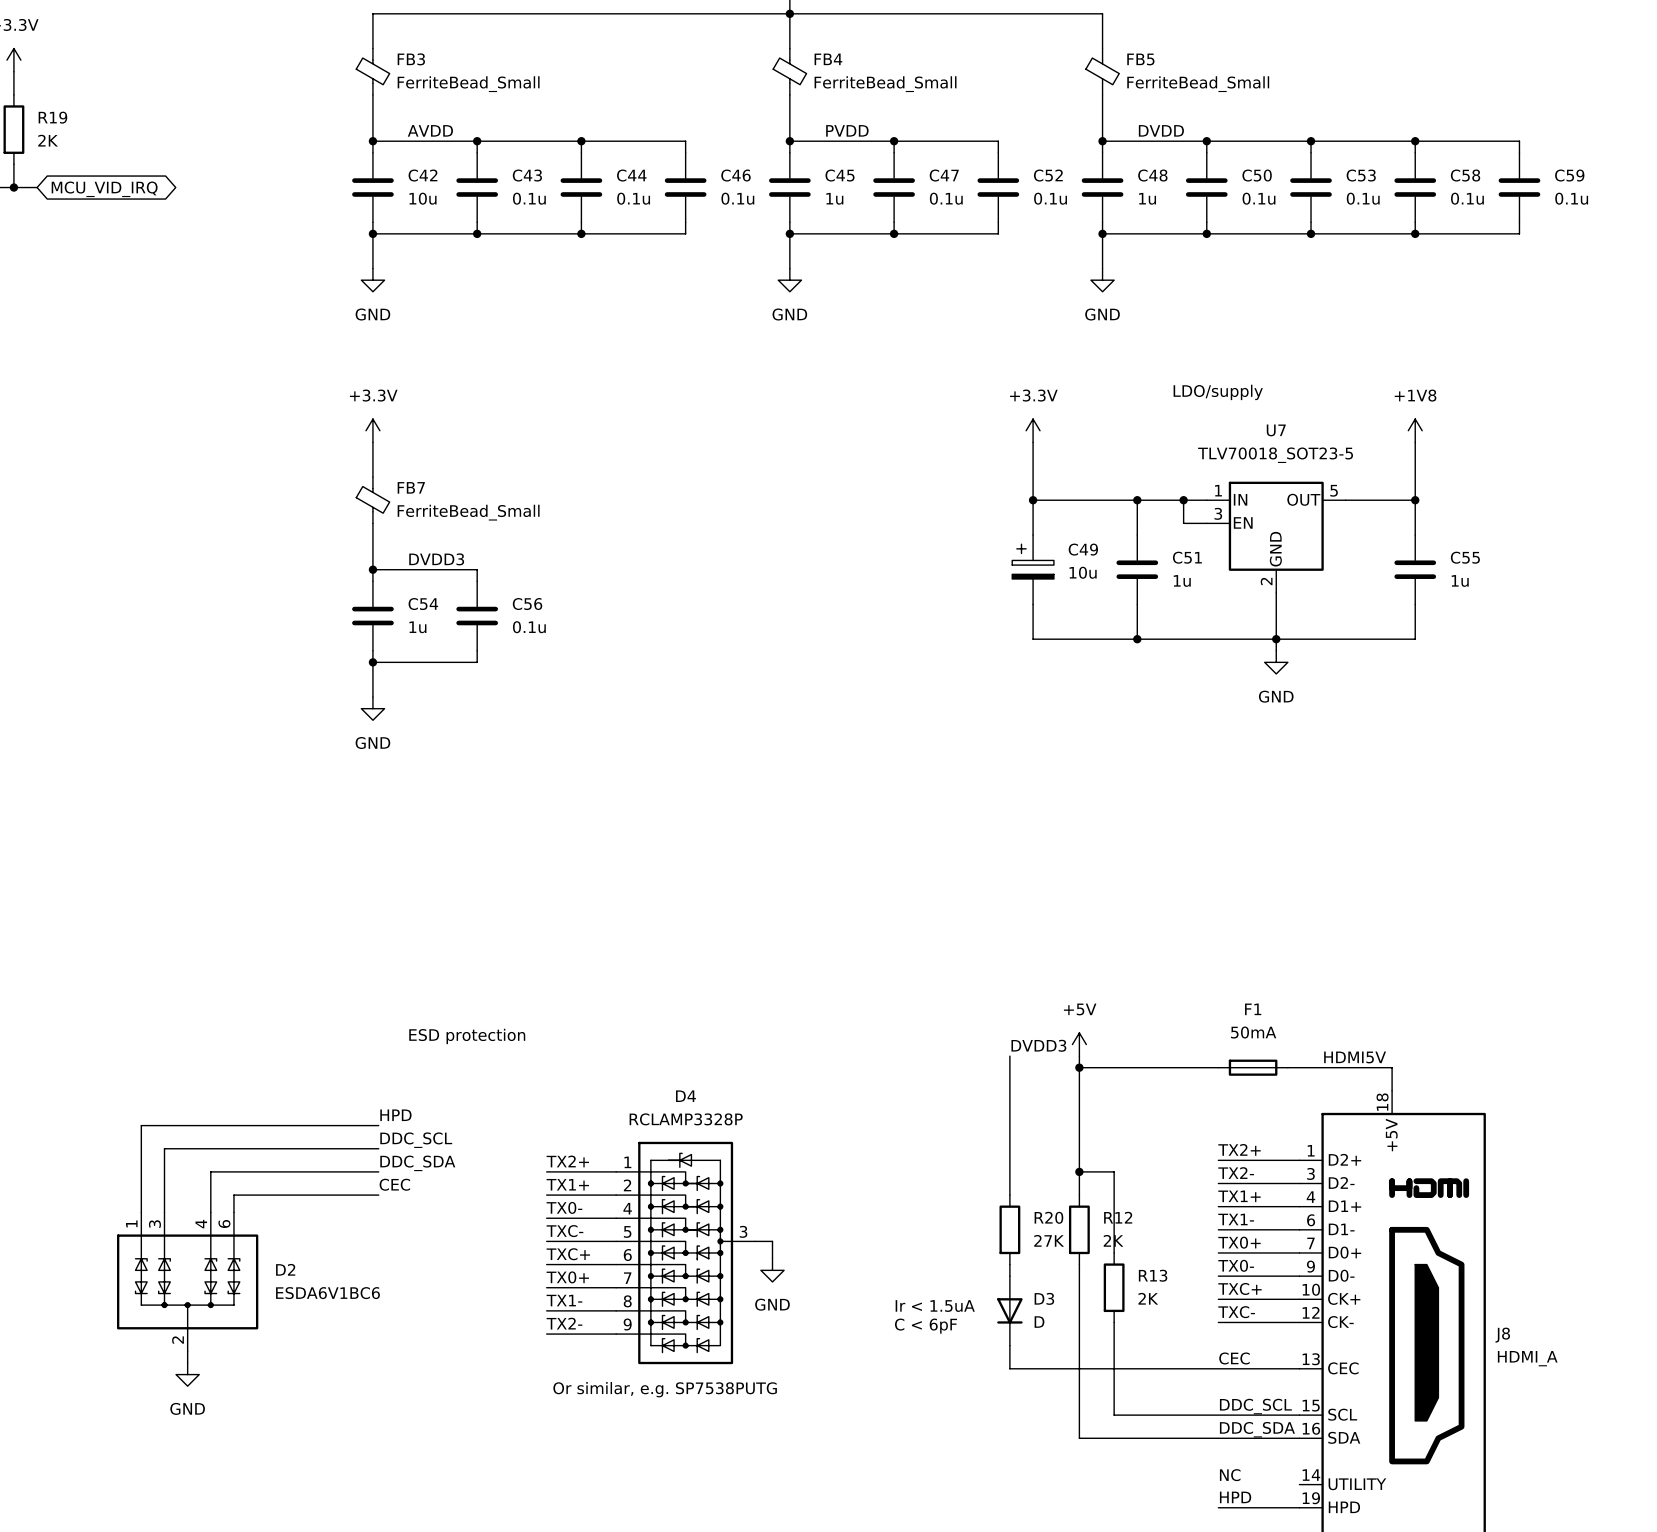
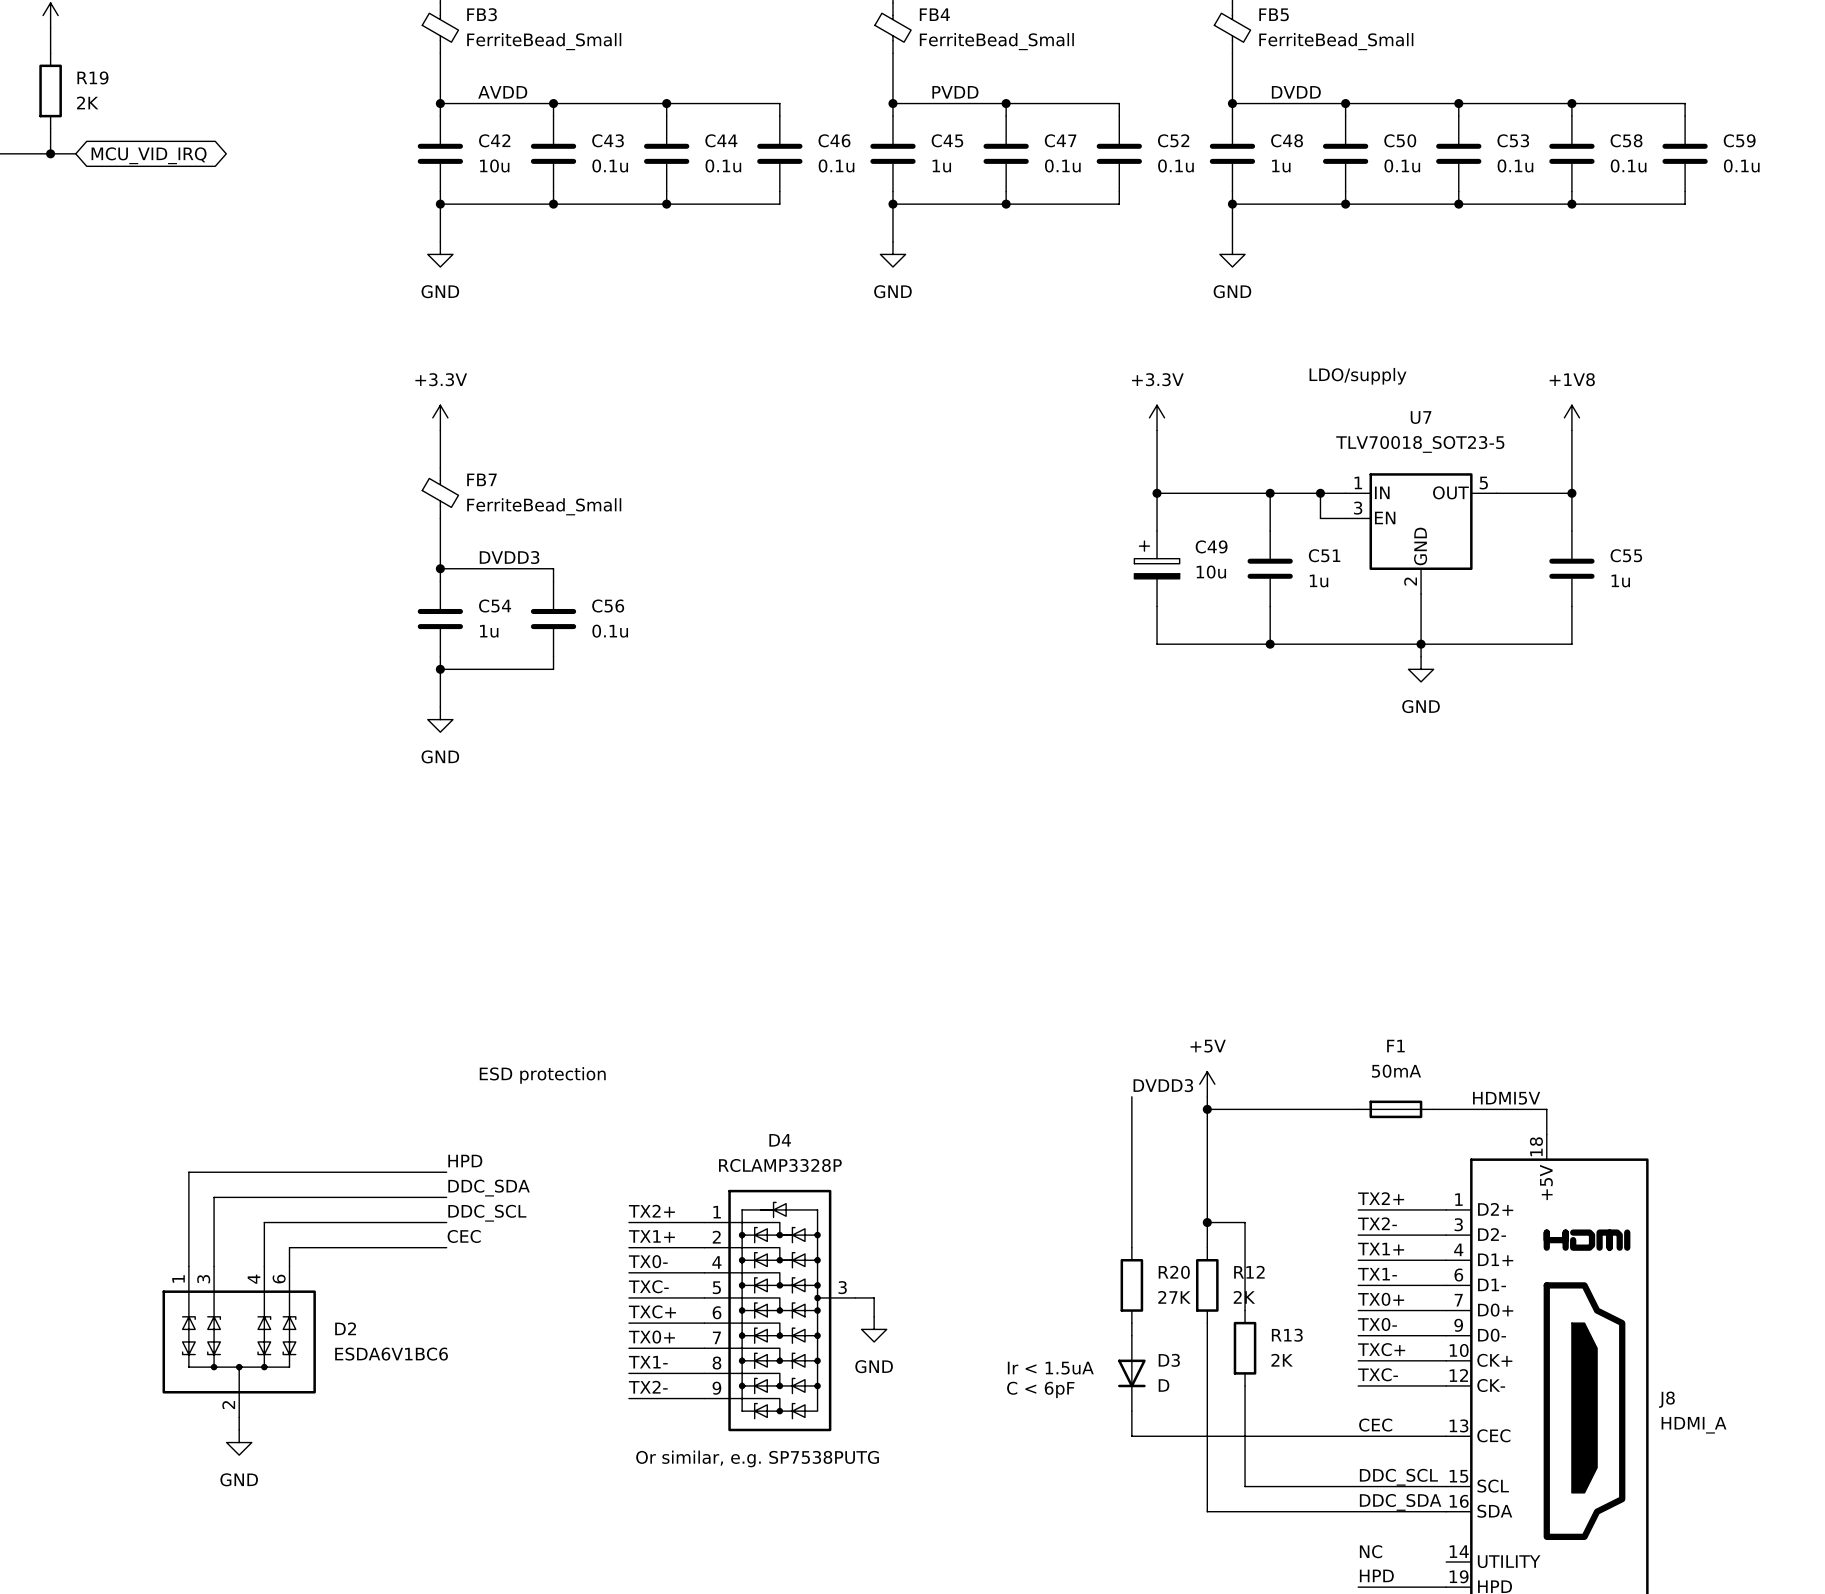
label: DDC_SCL (416, 1140) -> DDC_SDA (489, 1188)
label: DDC_SDA (417, 1163) -> DDC_SCL (487, 1213)

